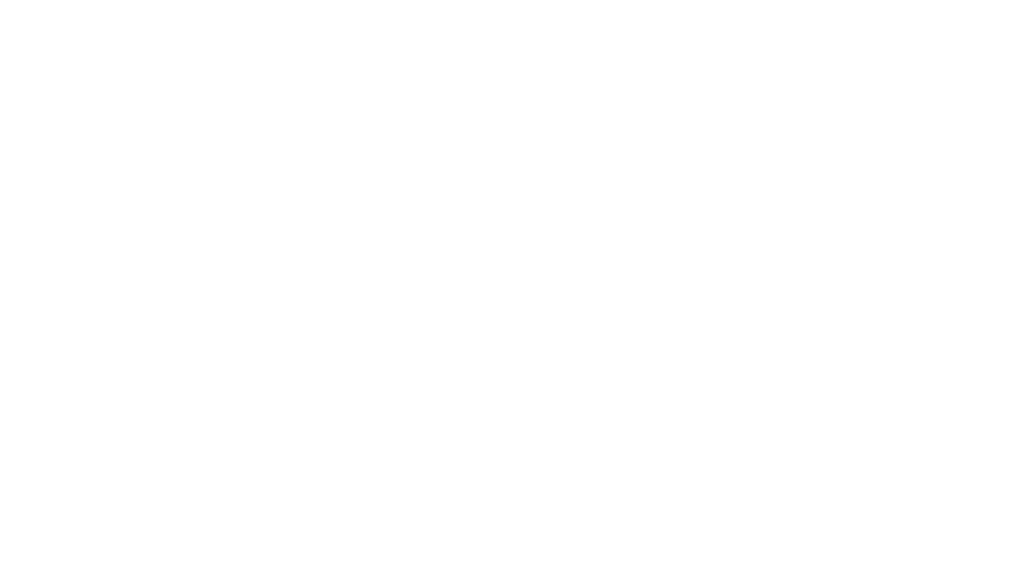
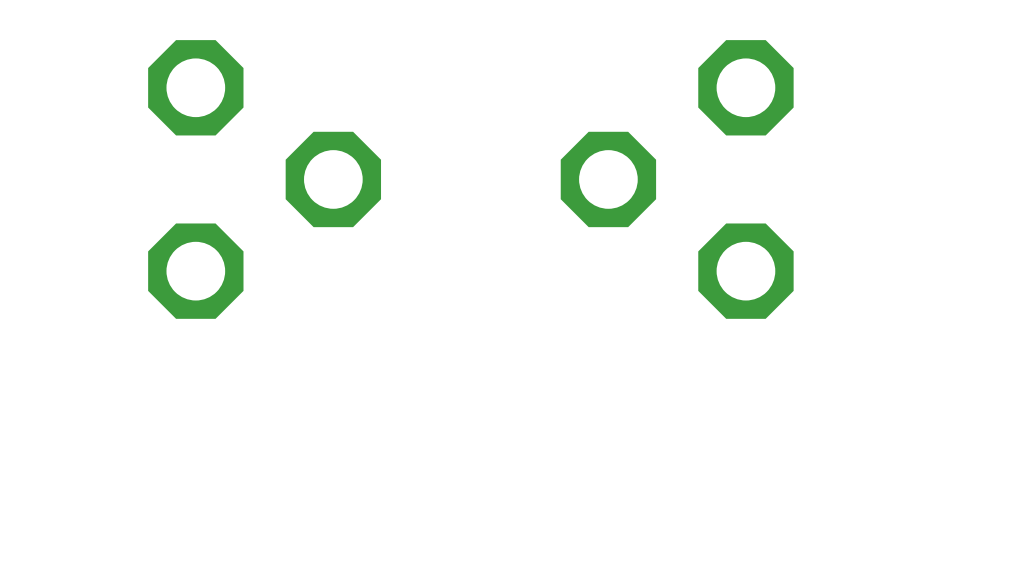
part: none -> (264, 179)
part: none -> (677, 179)

